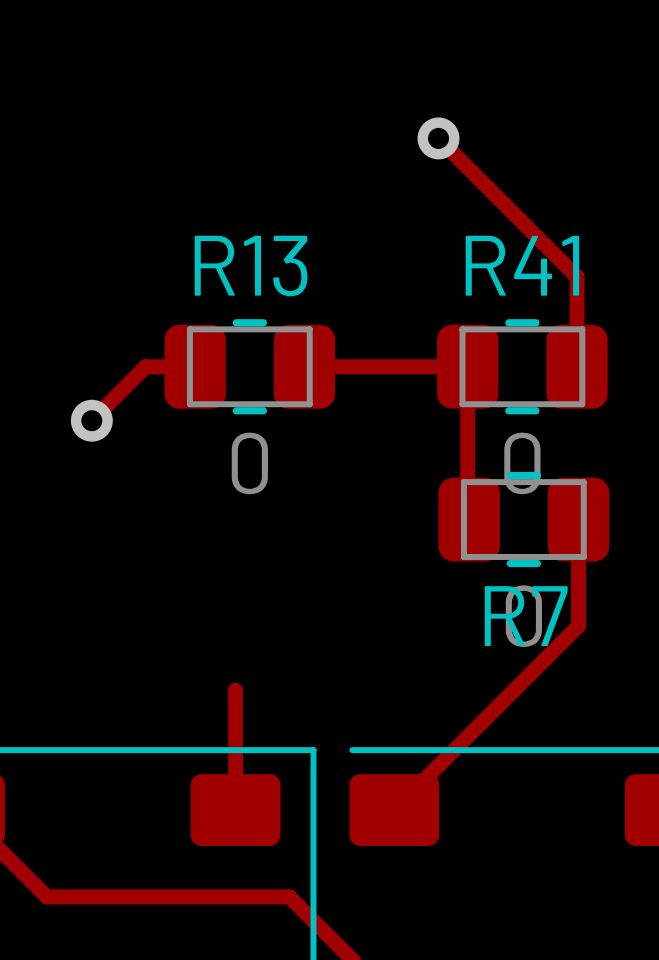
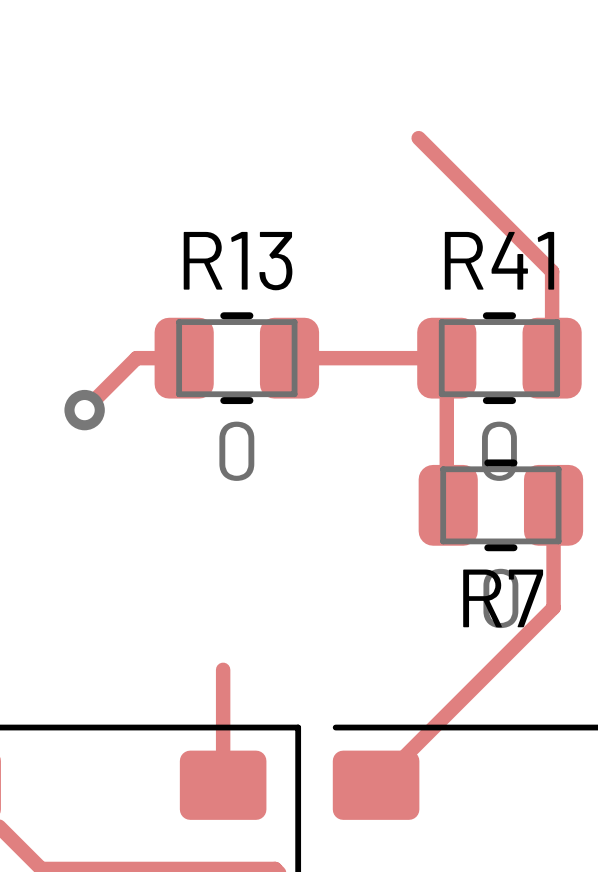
via: (438, 138) -> none

